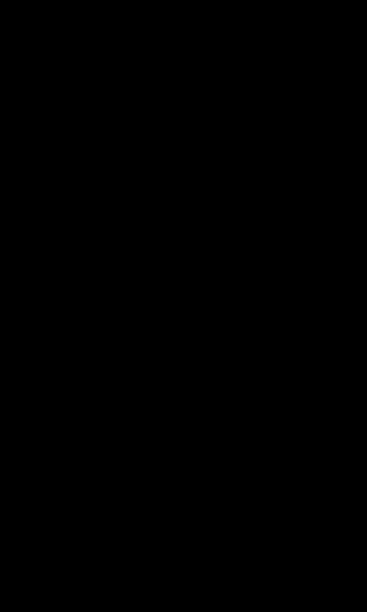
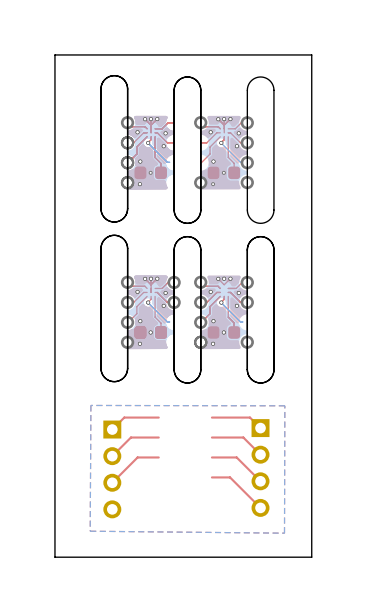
board edge: none -> (311, 54) (54, 54) (54, 557) (311, 557) (311, 54)
board edge: none -> (101, 88) (101, 208)
board edge: none -> (127, 88) (127, 208)
board edge: none -> (127, 88) (123, 79) (114, 75) (104, 80) (101, 88)
board edge: none -> (127, 88) (123, 79) (114, 75) (104, 80) (101, 88)
board edge: none -> (174, 90) (174, 210)
board edge: none -> (200, 90) (200, 210)
board edge: none -> (200, 90) (196, 80) (187, 76) (177, 81) (174, 90)
board edge: none -> (200, 90) (196, 80) (187, 76) (177, 81) (174, 90)
board edge: none -> (273, 90) (273, 211) (268, 220) (258, 223) (251, 219) (247, 211) (247, 88) (251, 80) (260, 76) (269, 80) (273, 90)
top track: none -> (145, 119) (150, 125)
via: none -> (145, 119)
via: none -> (150, 119)
top track: none -> (157, 119) (151, 125)
via: none -> (157, 119)
top track: none -> (218, 119) (224, 125)
via: none -> (218, 119)
via: none -> (224, 119)
top track: none -> (230, 119) (224, 125)
via: none -> (230, 119)
top track: none -> (151, 120) (151, 132)
top track: none -> (224, 120) (224, 132)
via: none -> (127, 122)
top track: none -> (128, 122) (132, 126) (144, 126) (147, 128)
top track: none -> (173, 122) (168, 122) (162, 128) (155, 128)
via: none -> (200, 122)
top track: none -> (201, 122) (205, 126) (218, 126) (220, 128)
top track: none -> (247, 122) (241, 122) (235, 128) (228, 128)
via: none -> (247, 122)
via: none -> (137, 132)
top track: none -> (147, 132) (143, 132) (133, 142) (128, 142)
top track: none -> (155, 132) (167, 142) (173, 142)
via: none -> (210, 132)
top track: none -> (220, 132) (216, 132) (206, 142) (201, 142)
top track: none -> (228, 132) (240, 142) (246, 142)
via: none -> (165, 133)
via: none -> (238, 133)
top track: none -> (147, 136) (136, 147) (136, 154) (128, 162)
top track: none -> (151, 136) (147, 142)
top track: none -> (155, 136) (155, 157) (161, 163) (161, 172)
top track: none -> (220, 136) (210, 147) (210, 154) (201, 162)
top track: none -> (224, 136) (220, 142)
top track: none -> (228, 136) (228, 157) (234, 163) (234, 172)
via: none -> (127, 142)
bottom track: none -> (147, 142) (169, 162)
via: none -> (148, 142)
bottom track: none -> (221, 142) (242, 162)
via: none -> (221, 142)
via: none -> (247, 142)
via: none -> (163, 146)
via: none -> (236, 146)
via: none -> (140, 161)
via: none -> (213, 161)
via: none -> (127, 162)
via: none -> (247, 162)
part: none -> (150, 172)
via: none -> (150, 172)
part: none -> (223, 172)
via: none -> (223, 172)
via: none -> (127, 182)
via: none -> (200, 182)
via: none -> (247, 182)
via: none -> (139, 184)
via: none -> (213, 184)
board edge: none -> (127, 208) (123, 218) (114, 222) (104, 217) (101, 208)
board edge: none -> (127, 208) (123, 218) (114, 222) (104, 217) (101, 208)
board edge: none -> (200, 210) (196, 219) (187, 223) (177, 218) (174, 210)
board edge: none -> (200, 210) (196, 219) (187, 223) (177, 218) (174, 210)
board edge: none -> (101, 248) (101, 368)
board edge: none -> (127, 248) (127, 368)
board edge: none -> (127, 248) (123, 238) (114, 235) (104, 239) (101, 248)
board edge: none -> (127, 248) (123, 238) (114, 235) (104, 239) (101, 248)
board edge: none -> (174, 249) (174, 369)
board edge: none -> (200, 249) (200, 369)
board edge: none -> (200, 249) (196, 240) (187, 236) (178, 240) (174, 249)
board edge: none -> (200, 249) (196, 240) (187, 236) (178, 240) (174, 249)
board edge: none -> (247, 249) (247, 369)
board edge: none -> (273, 249) (273, 369)
board edge: none -> (273, 249) (270, 240) (260, 236) (251, 240) (247, 249)
board edge: none -> (273, 249) (270, 240) (260, 236) (251, 240) (247, 249)
top track: none -> (145, 278) (150, 284)
via: none -> (145, 278)
via: none -> (150, 278)
top track: none -> (157, 278) (151, 284)
via: none -> (157, 278)
top track: none -> (218, 278) (224, 284)
via: none -> (218, 278)
via: none -> (224, 278)
top track: none -> (230, 278) (224, 284)
via: none -> (230, 278)
top track: none -> (151, 280) (151, 292)
via: none -> (127, 282)
top track: none -> (128, 282) (132, 286) (144, 286) (147, 288)
top track: none -> (173, 282) (168, 282) (162, 288) (155, 288)
via: none -> (174, 282)
via: none -> (200, 282)
top track: none -> (201, 282) (205, 286) (218, 286) (220, 288)
top track: none -> (246, 282) (242, 282) (236, 288) (228, 288)
via: none -> (247, 282)
via: none -> (137, 291)
via: none -> (210, 291)
top track: none -> (147, 292) (143, 292) (133, 302) (128, 302)
top track: none -> (155, 292) (167, 302) (173, 302)
via: none -> (165, 292)
top track: none -> (220, 292) (216, 292) (206, 302) (201, 302)
top track: none -> (228, 292) (240, 302) (246, 302)
via: none -> (238, 292)
top track: none -> (147, 296) (136, 306) (136, 313) (128, 322)
top track: none -> (151, 296) (147, 302)
top track: none -> (155, 296) (155, 317) (161, 323) (161, 332)
top track: none -> (220, 296) (210, 306) (210, 313) (201, 322)
top track: none -> (224, 296) (220, 302)
top track: none -> (228, 296) (228, 317) (234, 323) (234, 332)
via: none -> (127, 302)
bottom track: none -> (147, 302) (169, 321)
via: none -> (148, 302)
via: none -> (174, 302)
via: none -> (200, 302)
bottom track: none -> (221, 302) (242, 321)
via: none -> (221, 302)
via: none -> (247, 302)
via: none -> (163, 305)
via: none -> (236, 305)
via: none -> (140, 321)
via: none -> (213, 321)
via: none -> (127, 322)
via: none -> (200, 322)
part: none -> (150, 332)
via: none -> (150, 332)
part: none -> (223, 332)
via: none -> (223, 332)
via: none -> (127, 342)
via: none -> (200, 342)
via: none -> (247, 342)
via: none -> (139, 343)
via: none -> (213, 343)
board edge: none -> (127, 368) (123, 378) (114, 381) (104, 377) (101, 368)
board edge: none -> (127, 368) (123, 378) (114, 381) (104, 377) (101, 368)
board edge: none -> (200, 369) (196, 379) (187, 382) (177, 378) (174, 369)
board edge: none -> (200, 369) (196, 379) (187, 382) (177, 378) (174, 369)
board edge: none -> (273, 369) (269, 379) (260, 382) (250, 378) (247, 369)
board edge: none -> (273, 369) (269, 379) (260, 382) (250, 378) (247, 369)
bottom zone outline: none -> (90, 405) (90, 531) (284, 533) (284, 405) (90, 405)
top track: none -> (158, 417) (124, 417) (112, 429)
top track: none -> (211, 417) (250, 417) (260, 428)
top track: none -> (158, 437) (130, 437) (112, 456)
top track: none -> (211, 437) (243, 437) (260, 454)
top track: none -> (158, 457) (137, 457) (112, 482)
top track: none -> (211, 457) (236, 457) (260, 481)
part: none -> (260, 467)
part: none -> (112, 469)
top track: none -> (211, 477) (230, 477) (260, 507)

